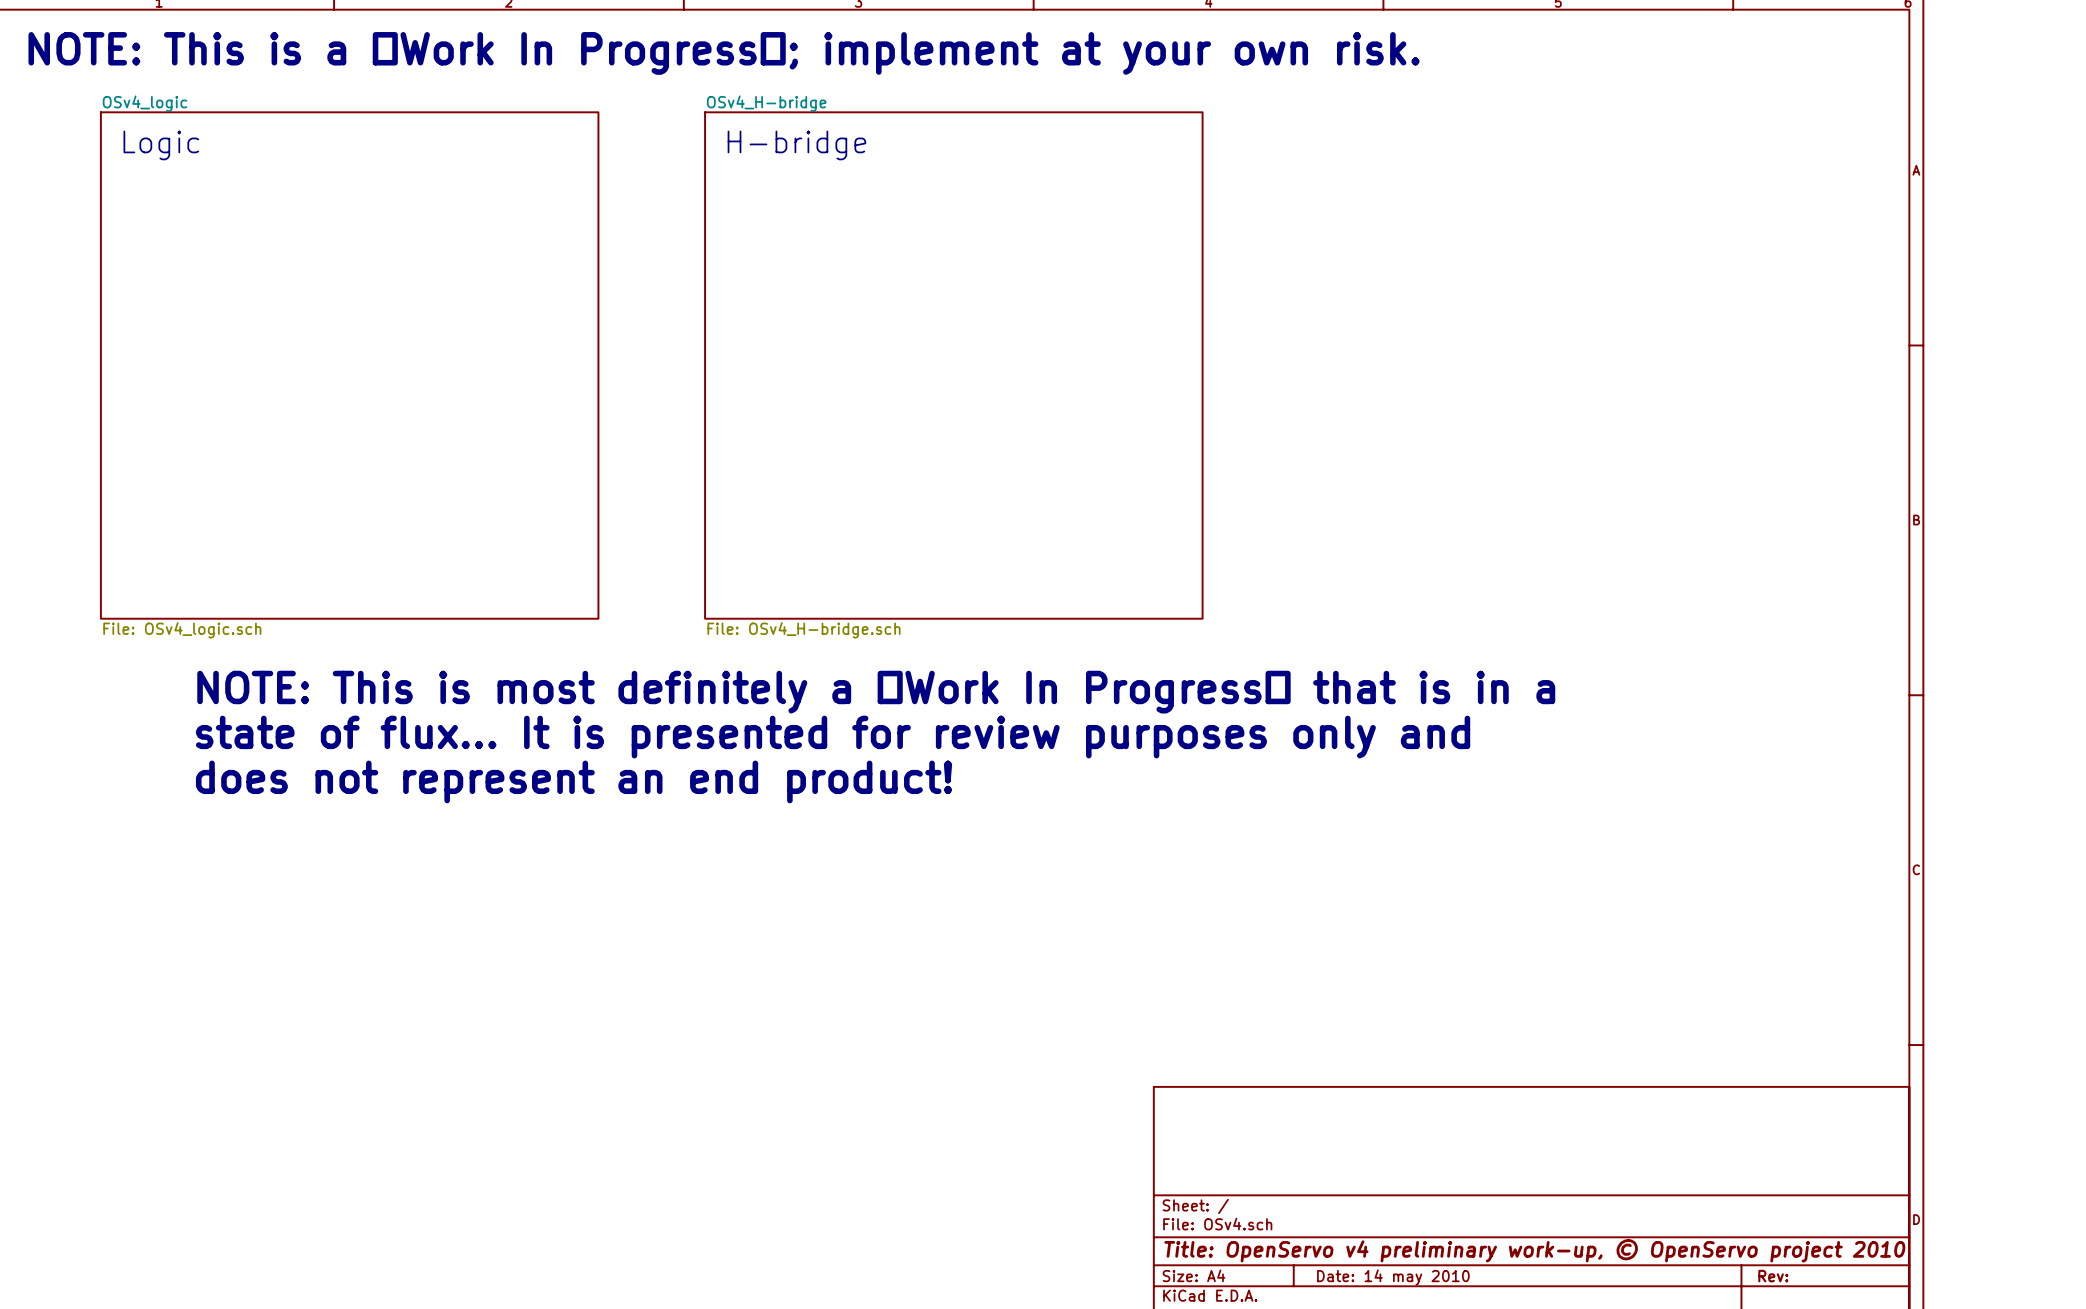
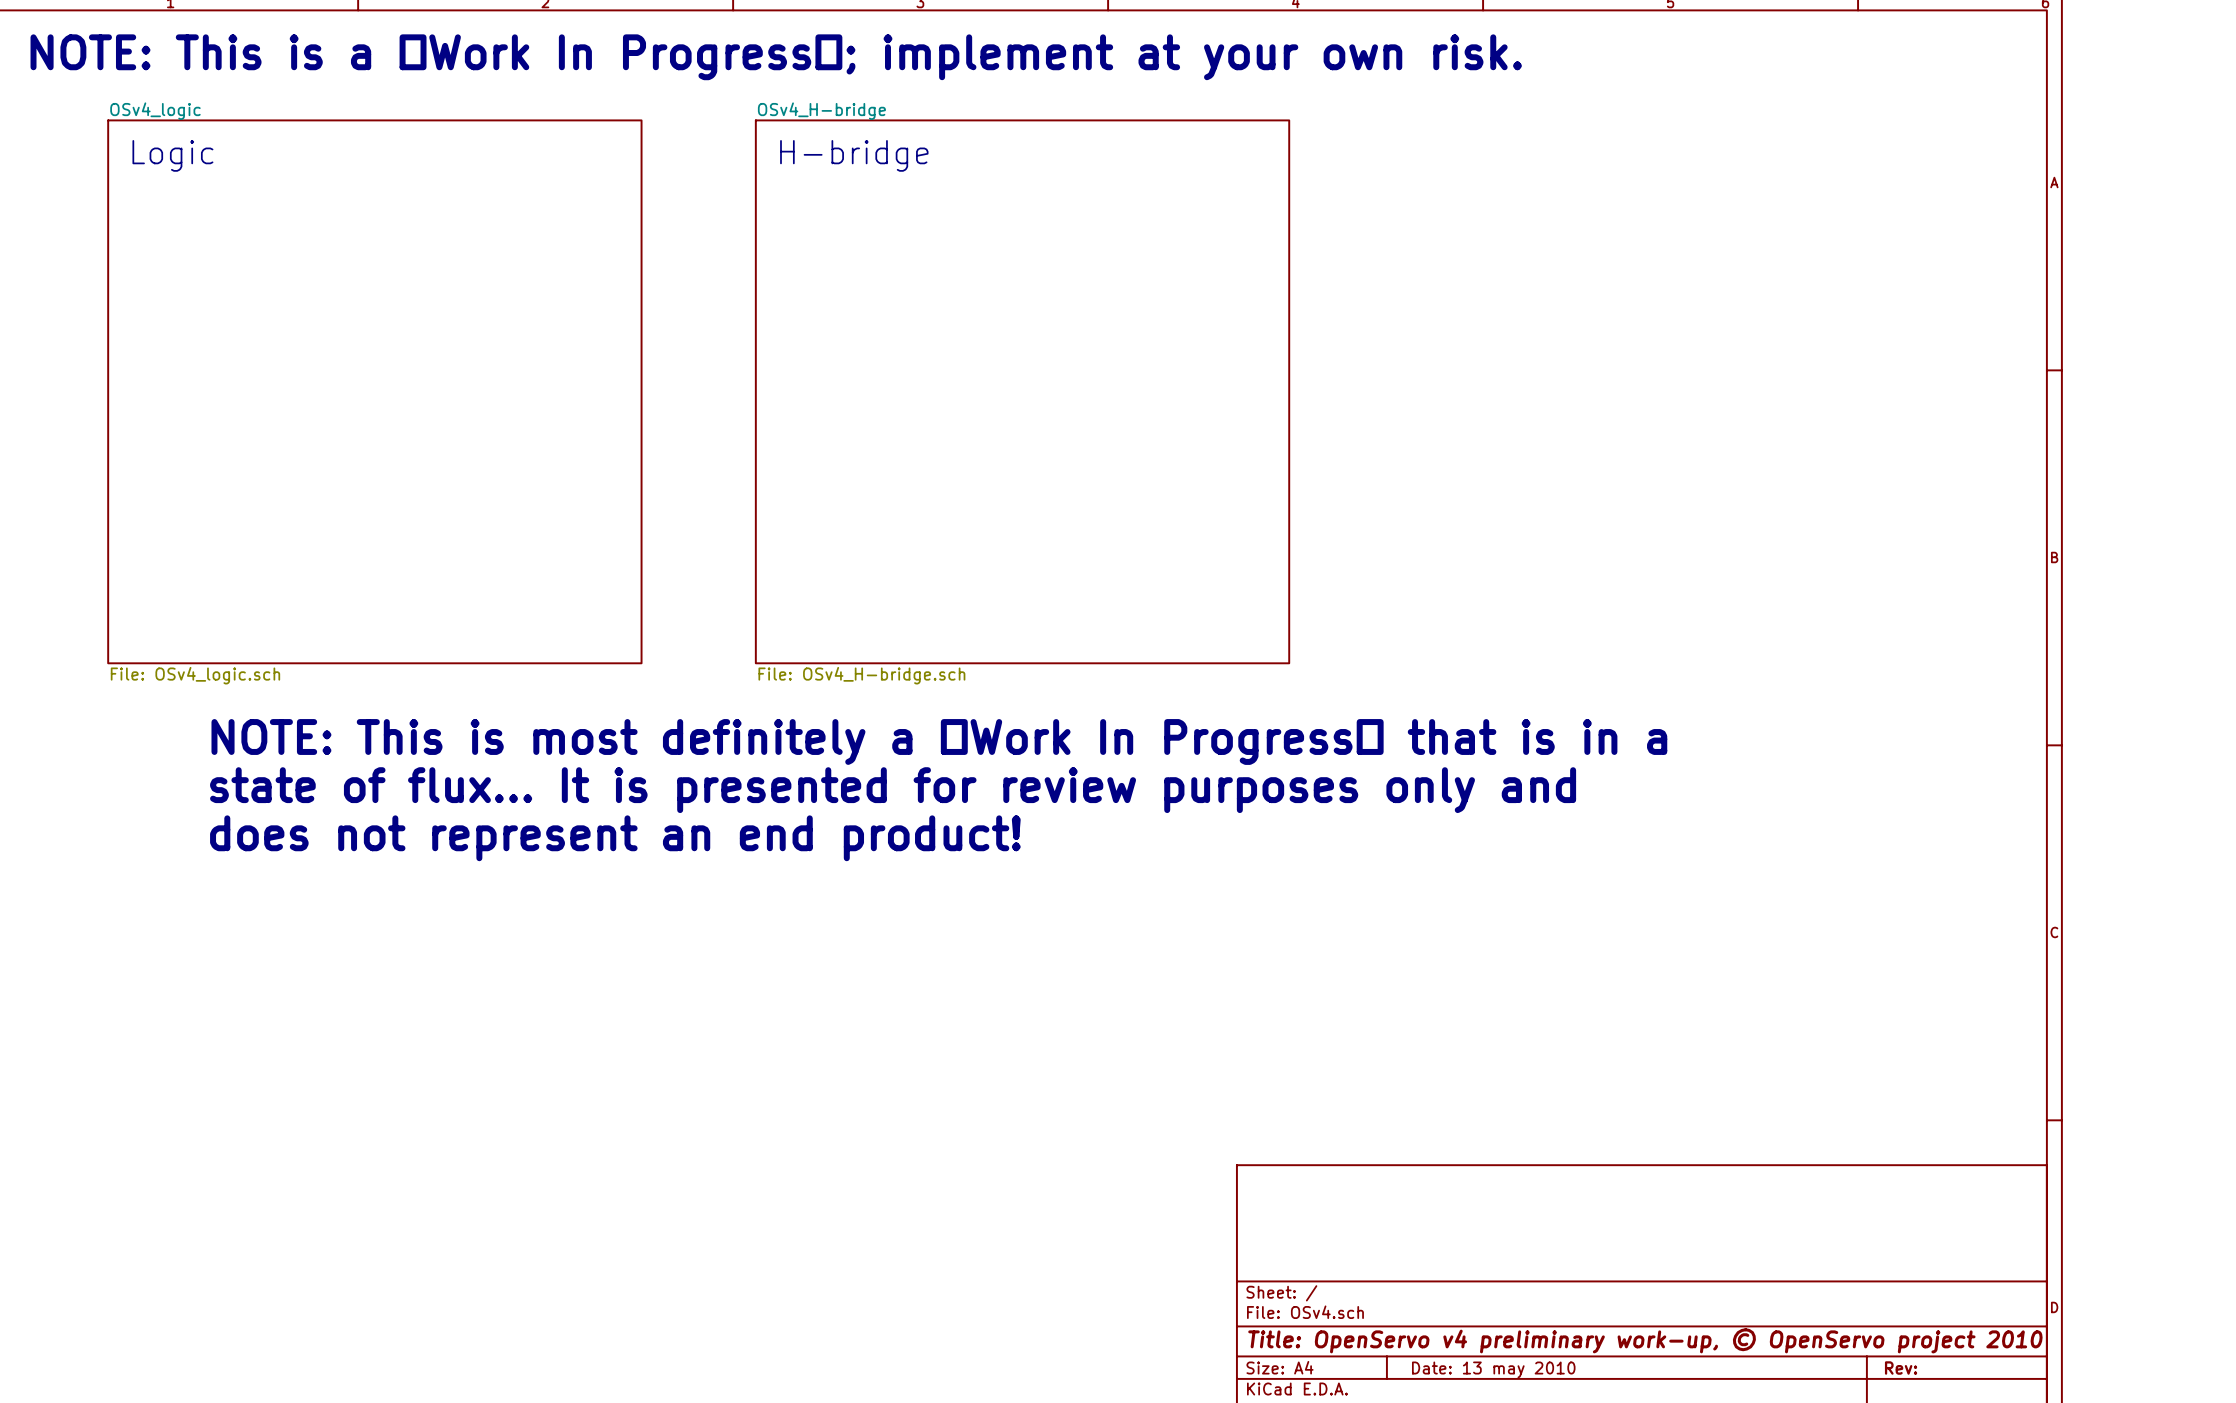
title block: Date: 14 may 2010 (1393, 1277) -> Date: 13 may 2010 (1493, 1369)

